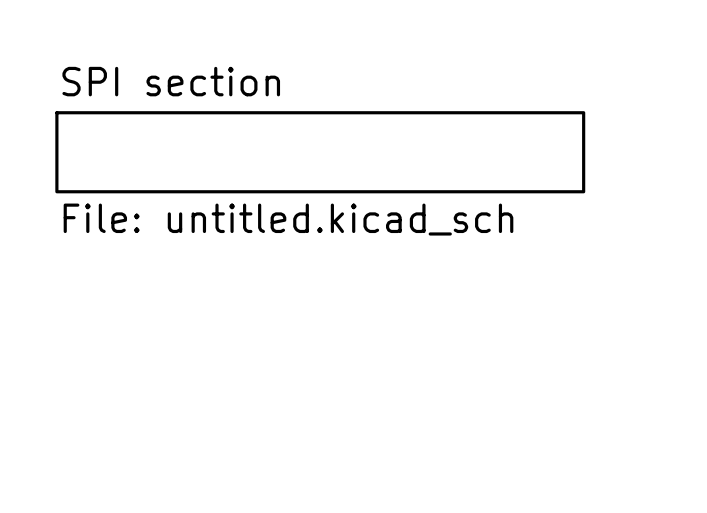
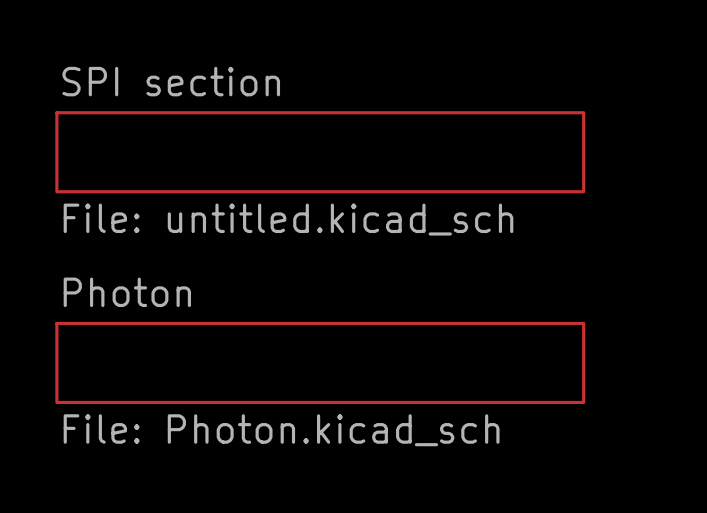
sheet Photon: none -> File: Photon.kicad_sch (320, 362)

